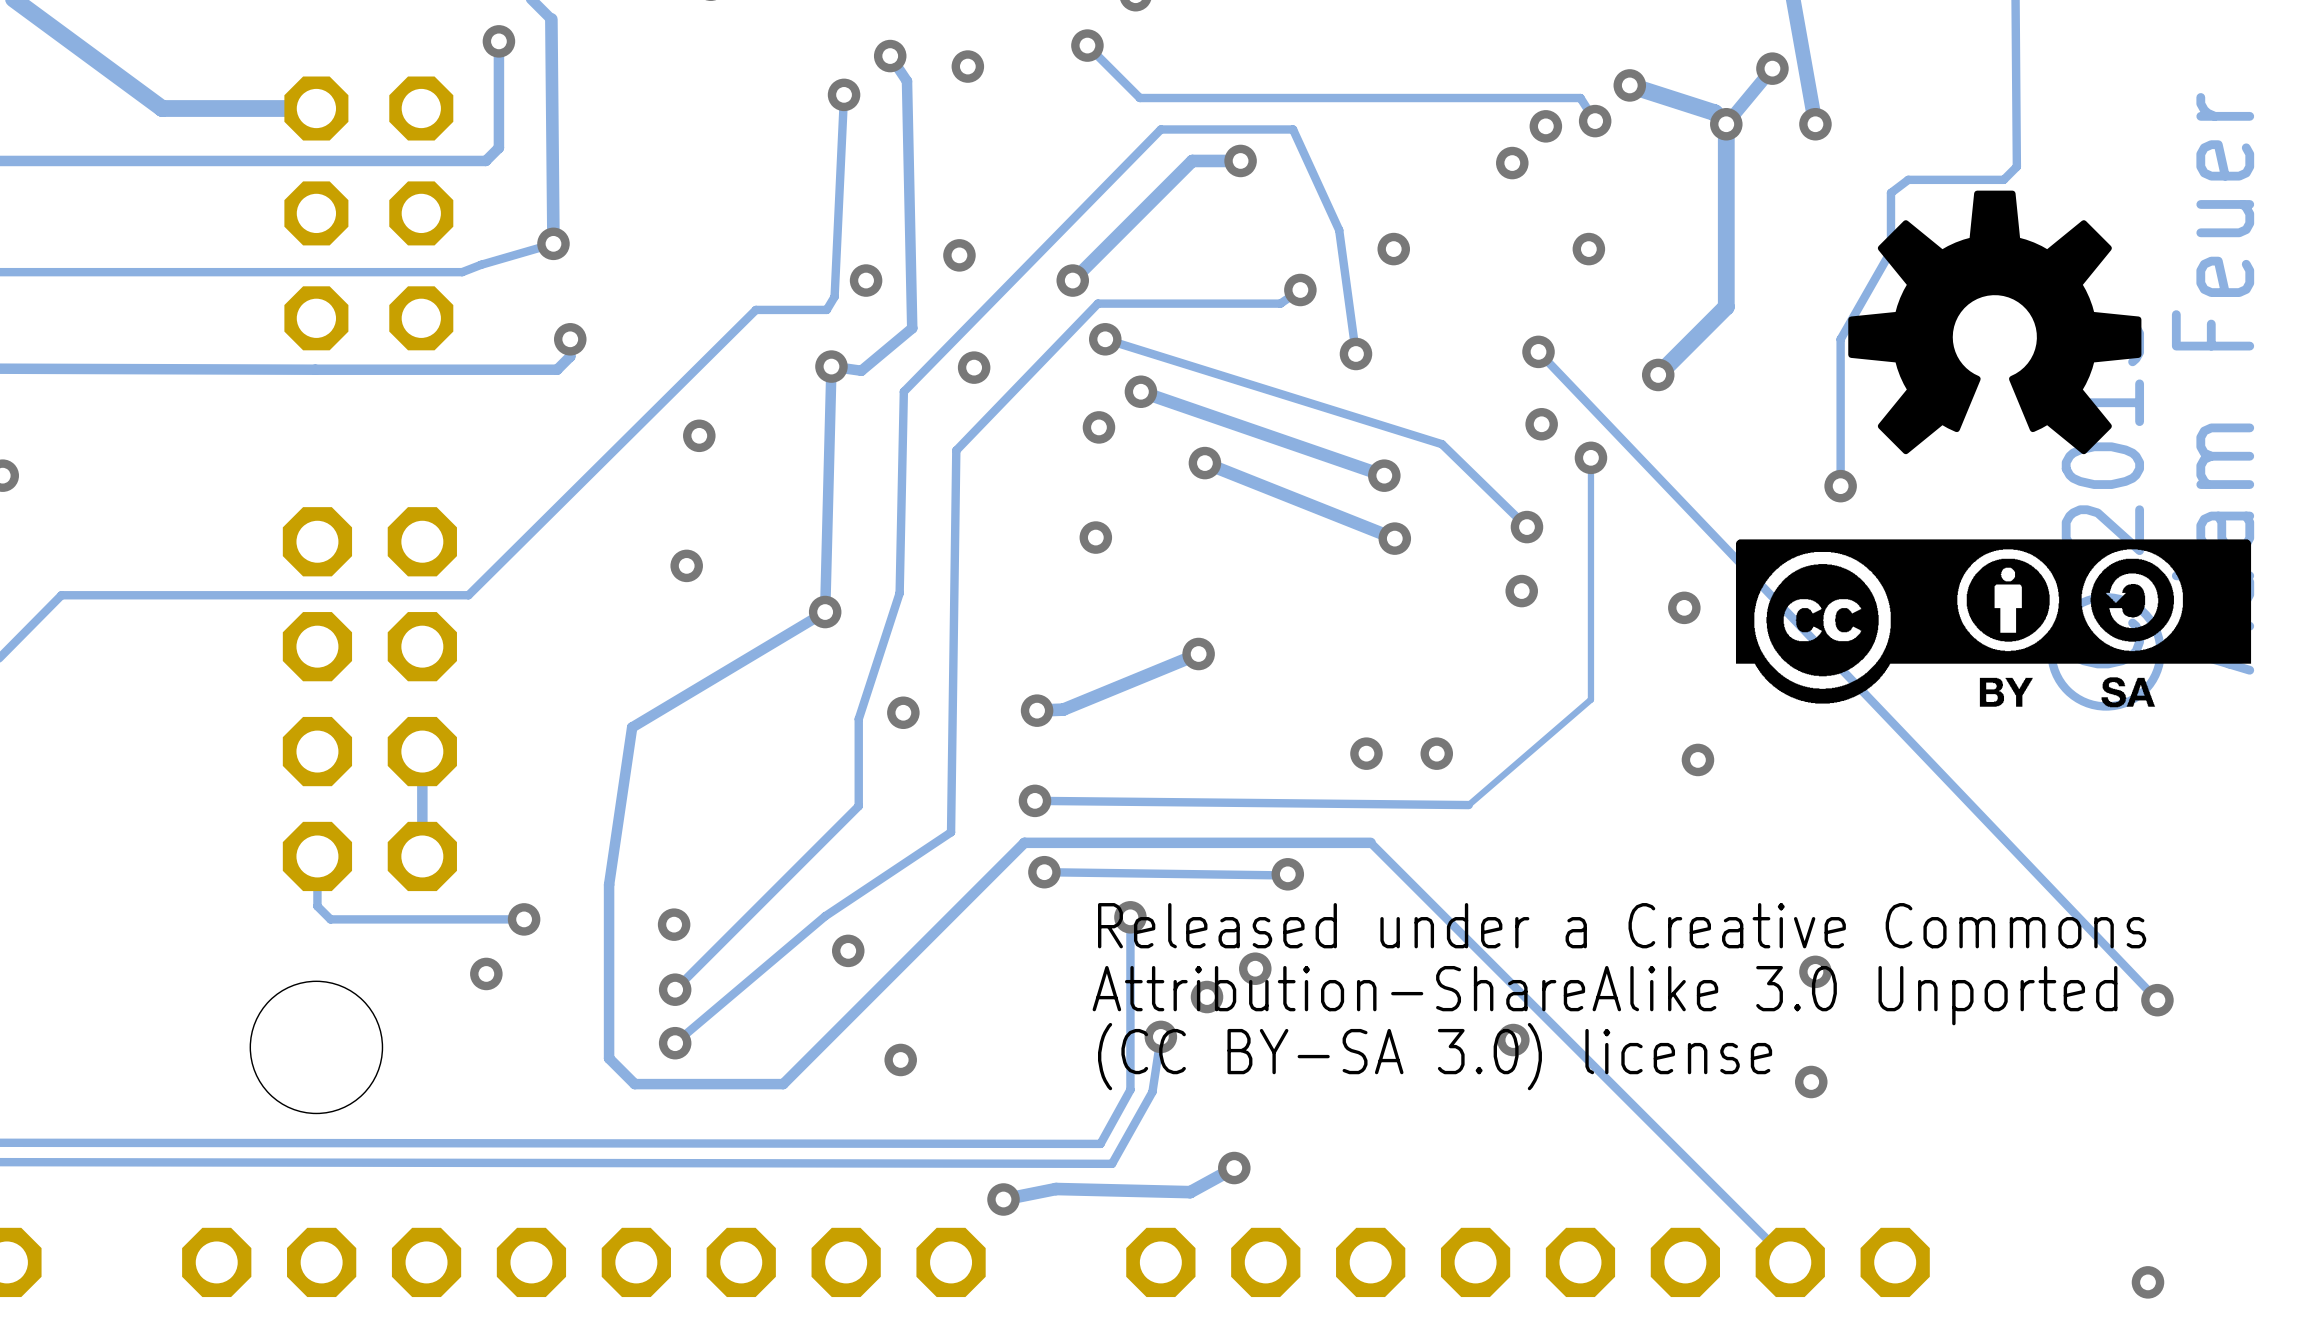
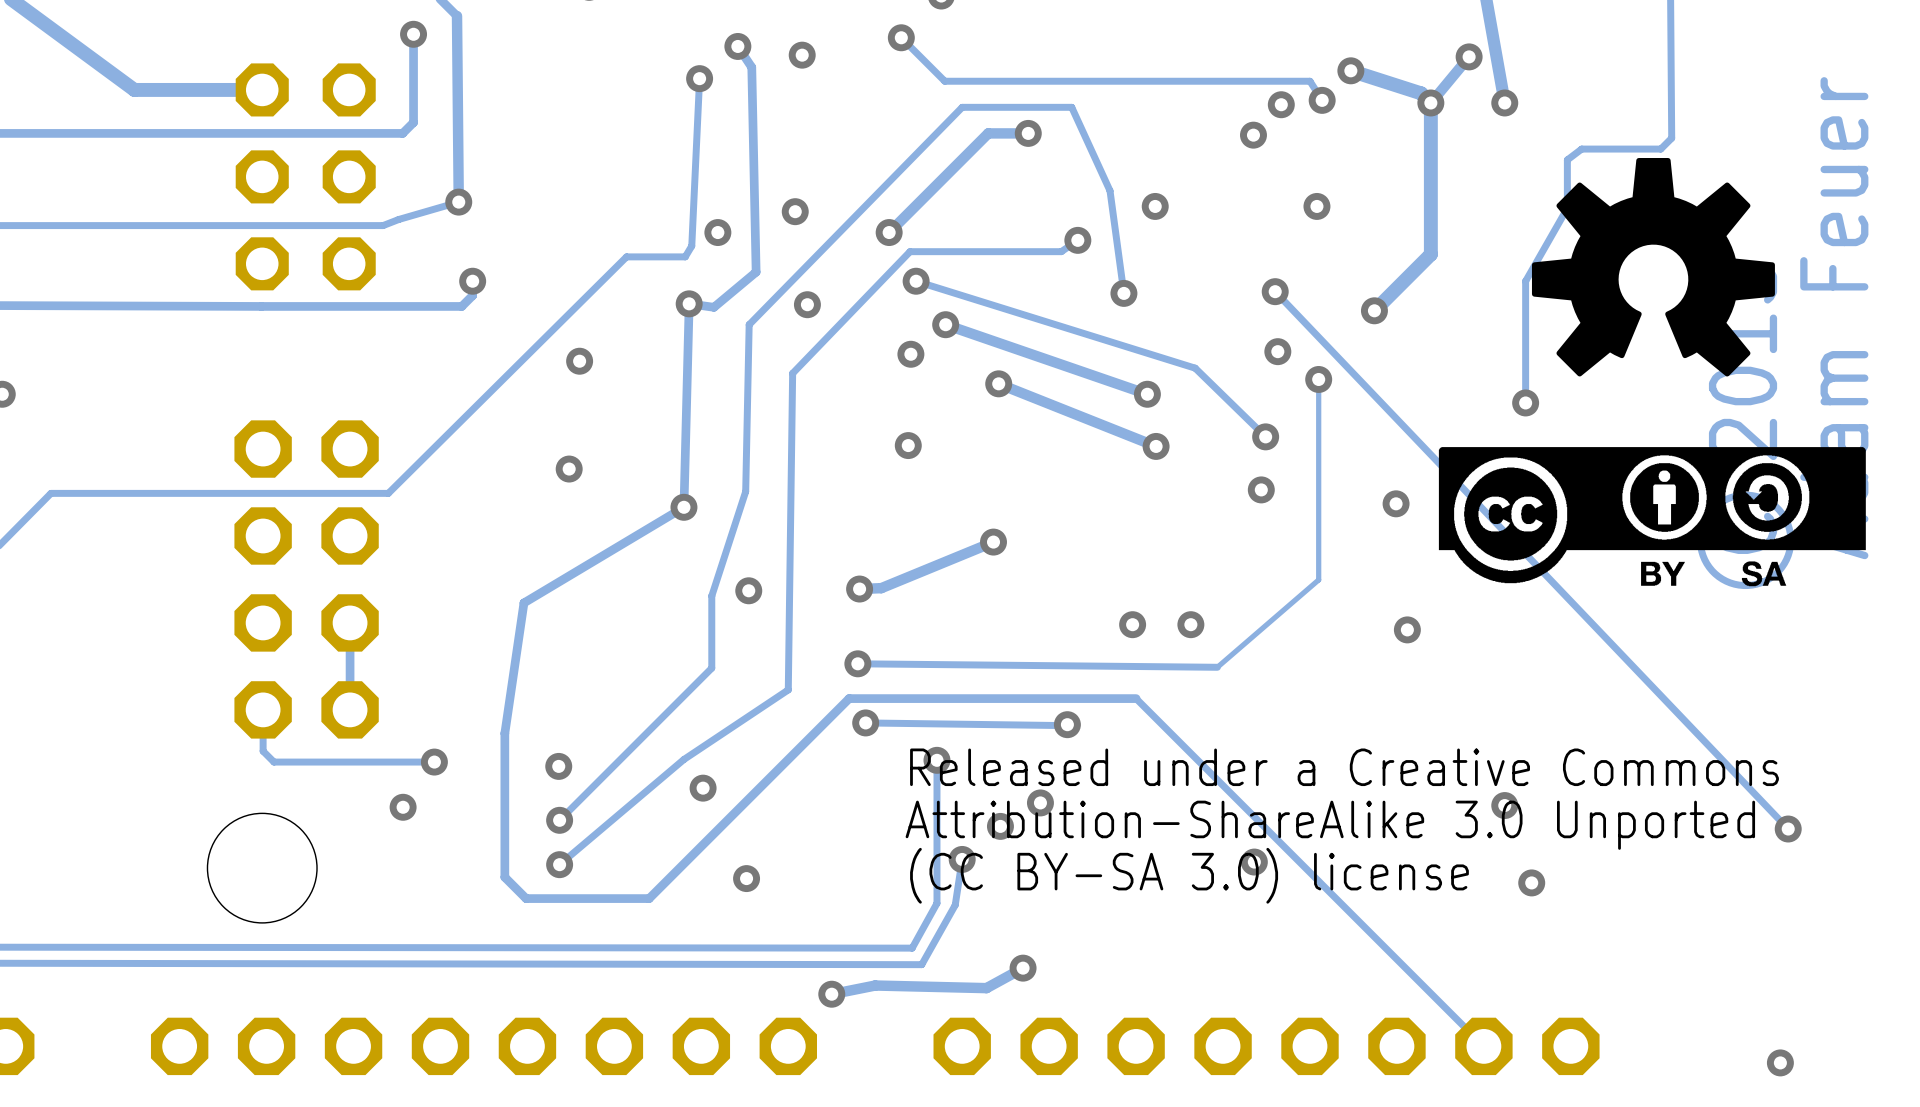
via position: (1811, 1082) -> (1531, 882)

